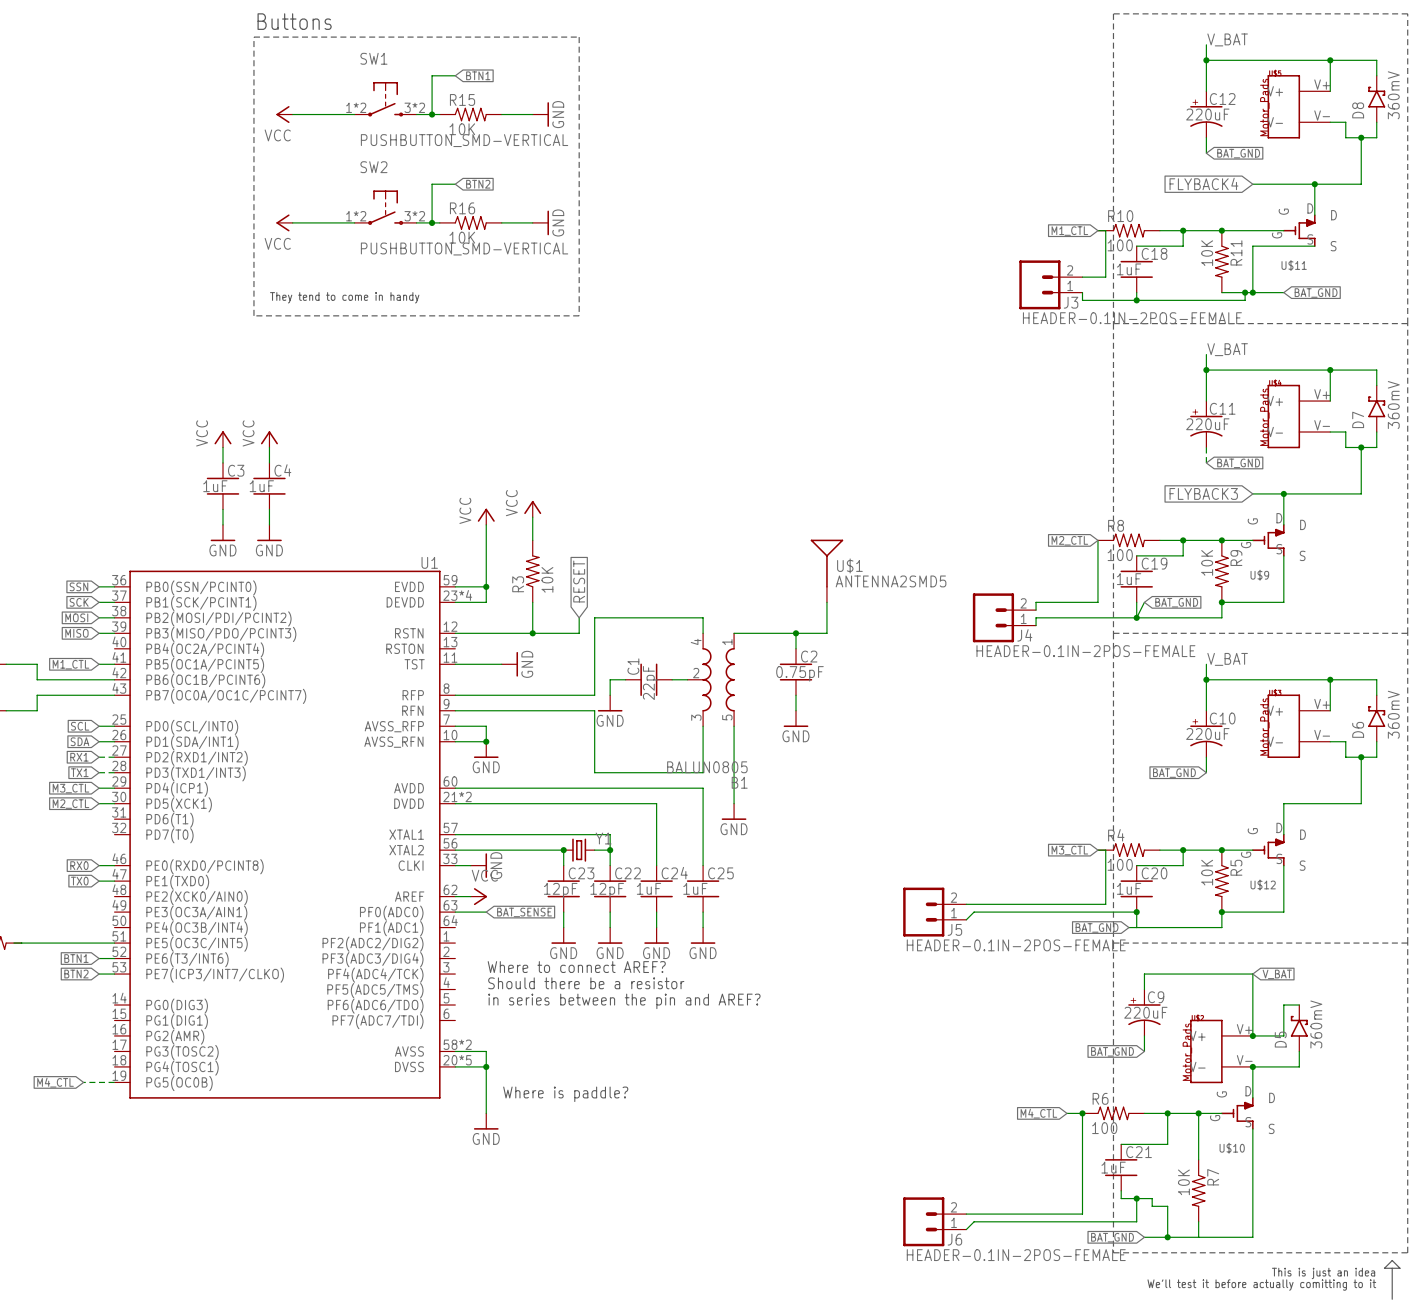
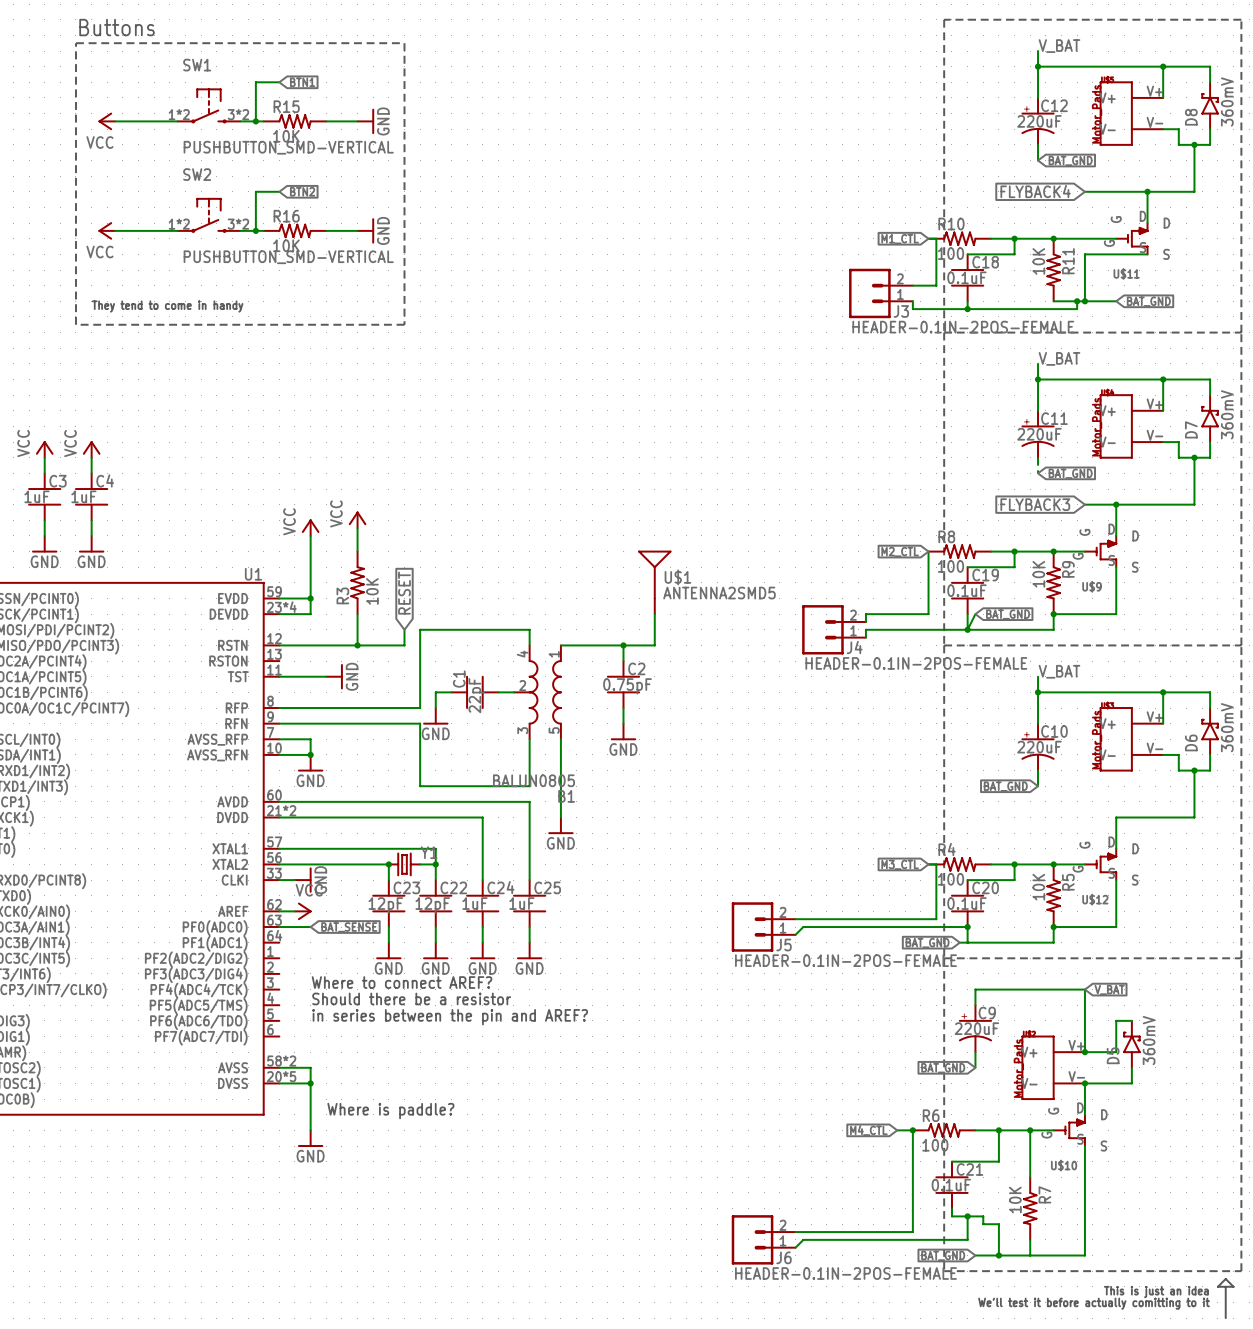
C18 value: 1uF (1129, 269) -> 0.1uF (966, 277)
C19 value: 1uF (1129, 579) -> 0.1uF (966, 590)
C20 value: 1uF (1129, 888) -> 0.1uF (966, 903)
C21 value: 1uF (1113, 1167) -> 0.1uF (951, 1185)

